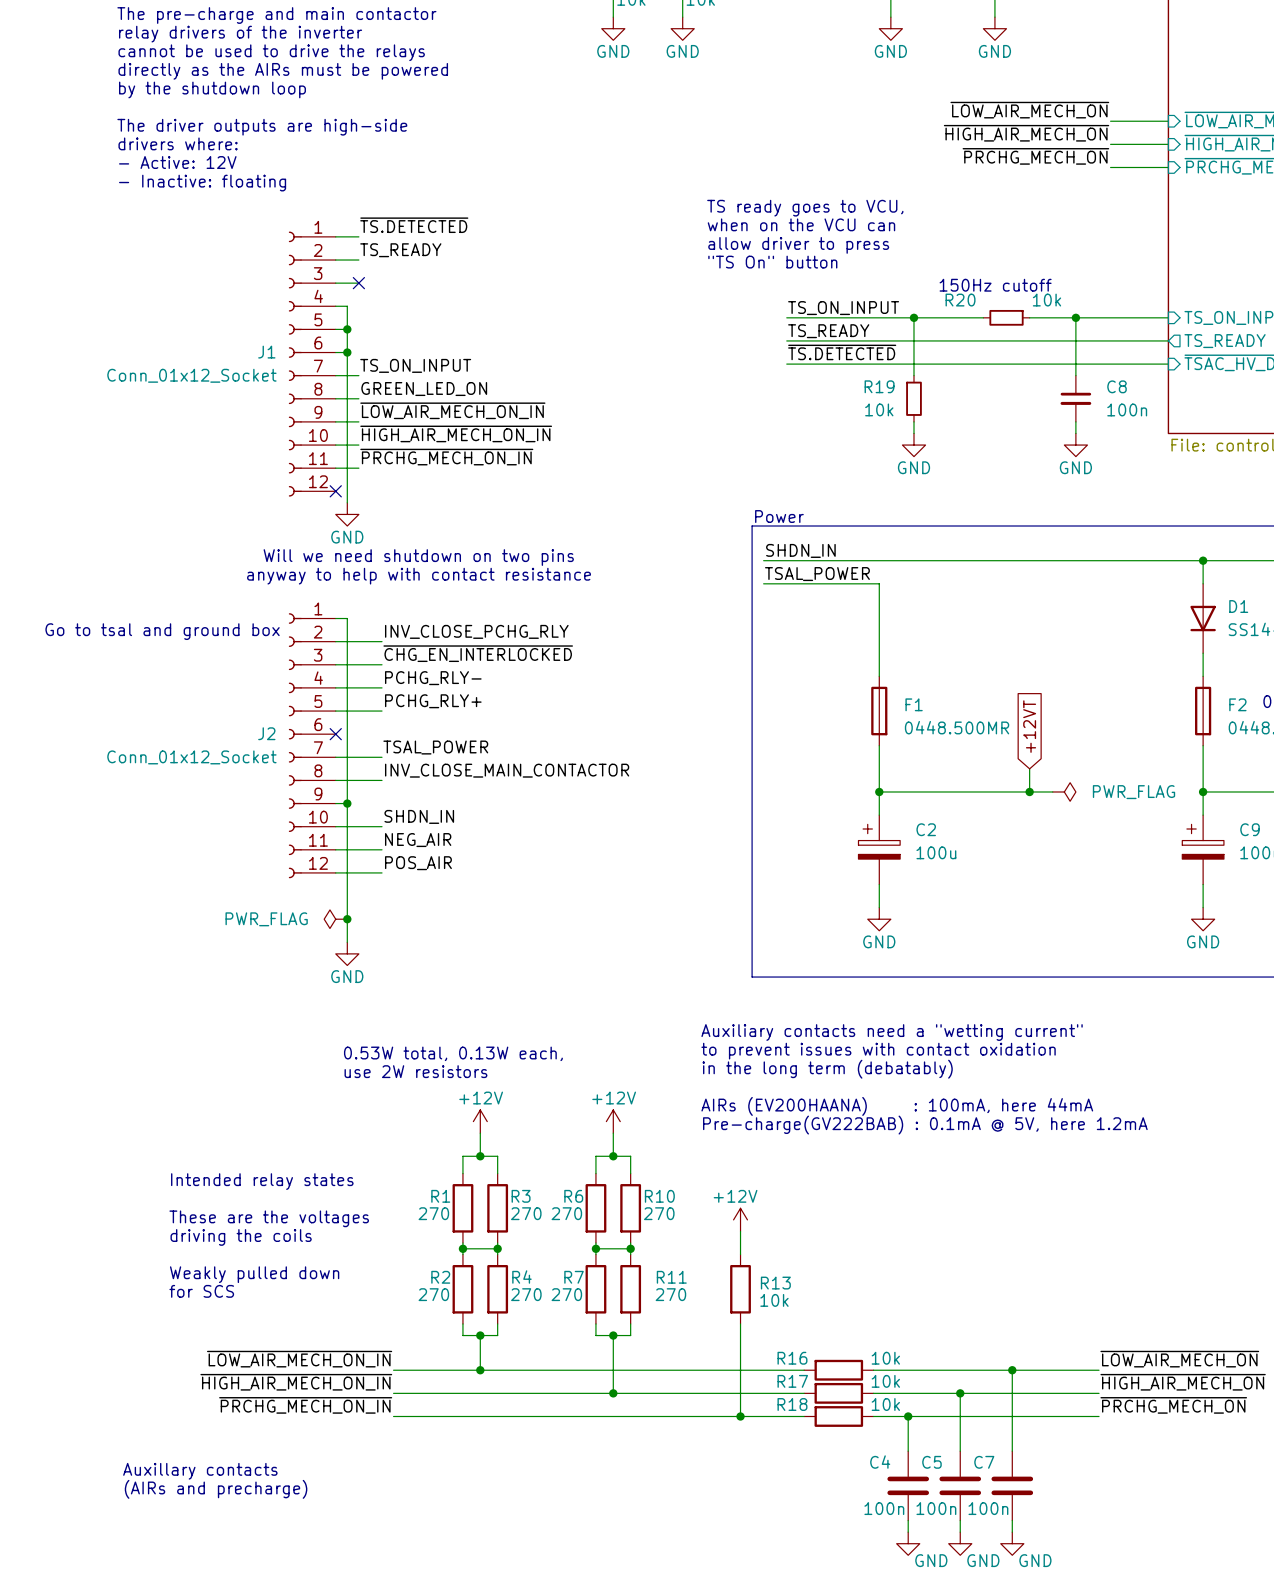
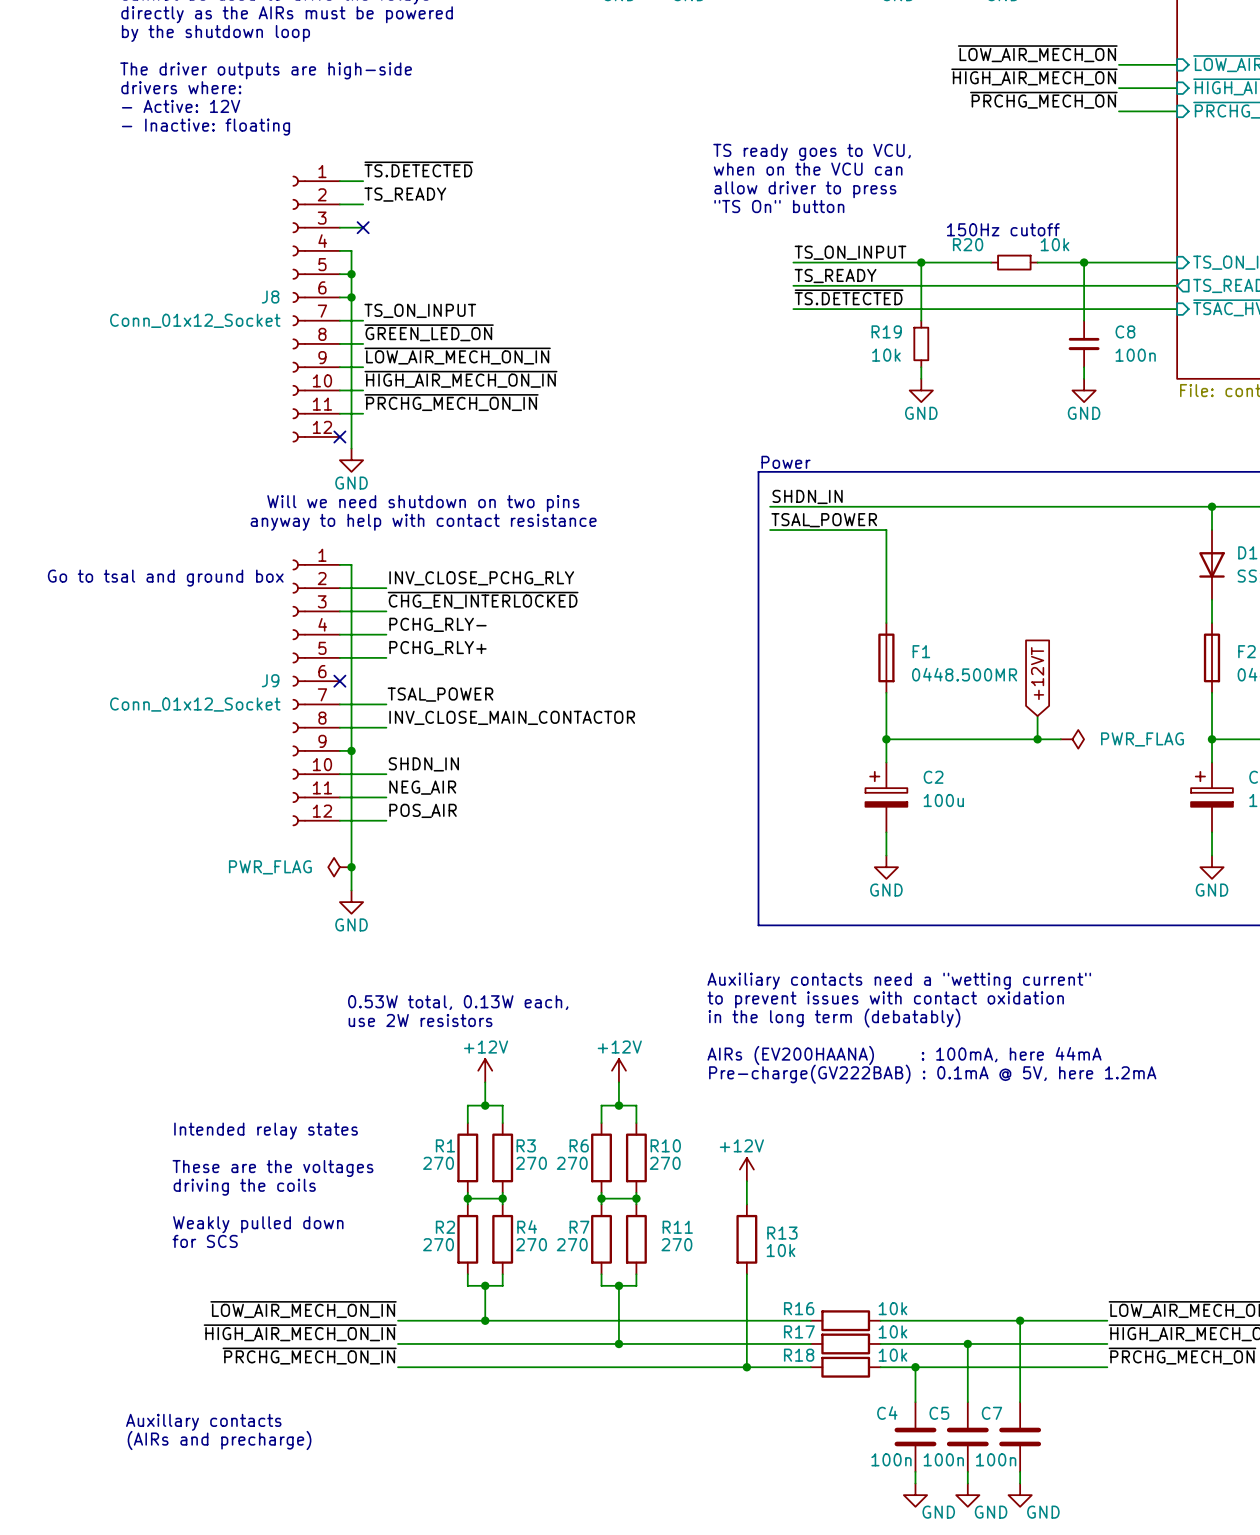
J1 name: J1 (266, 352) -> J8 (270, 297)
label: GREEN_LED_ON (424, 389) -> ~{GREEN_LED_ON} (429, 332)
J2 name: J2 (266, 733) -> J9 (270, 680)

